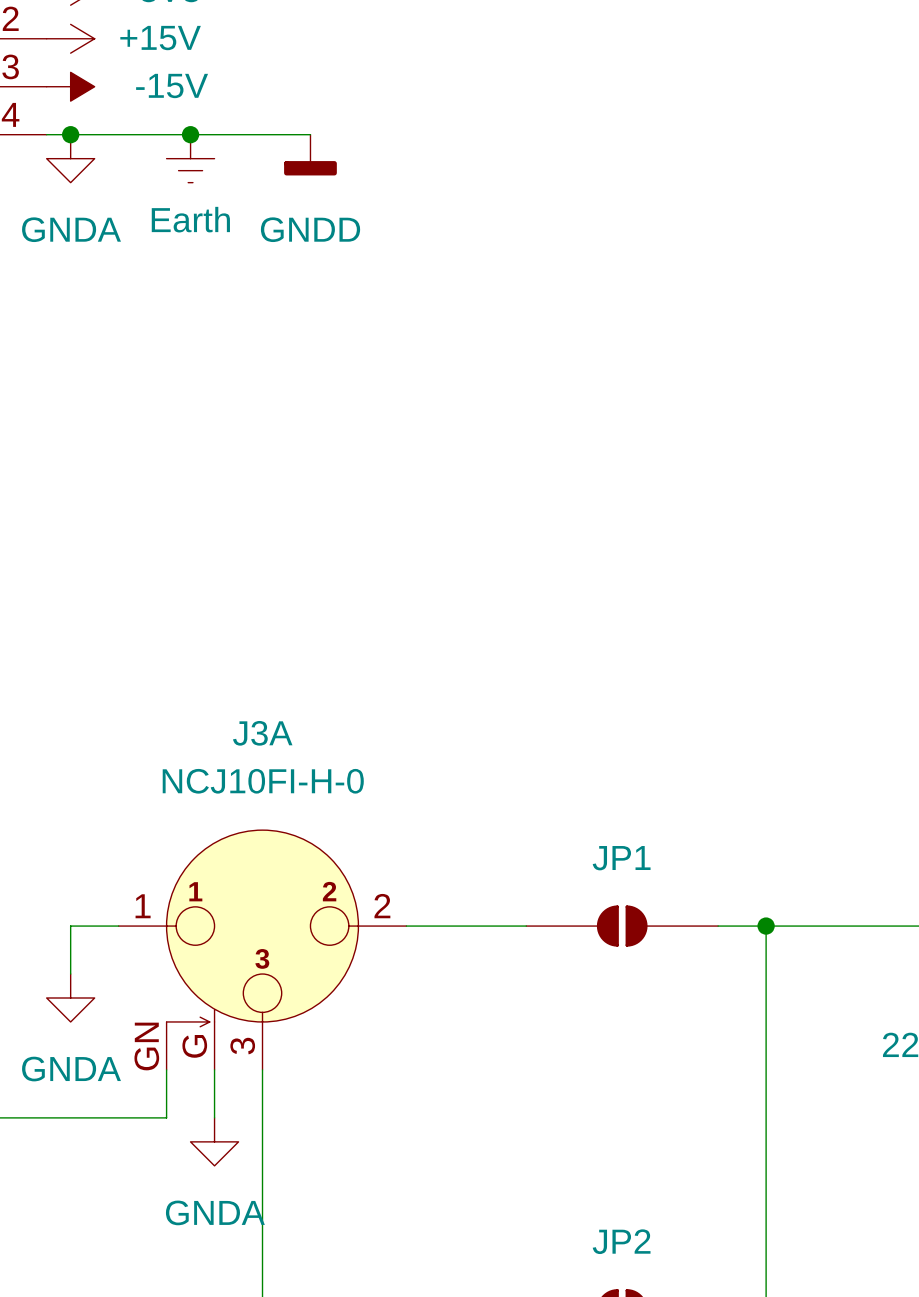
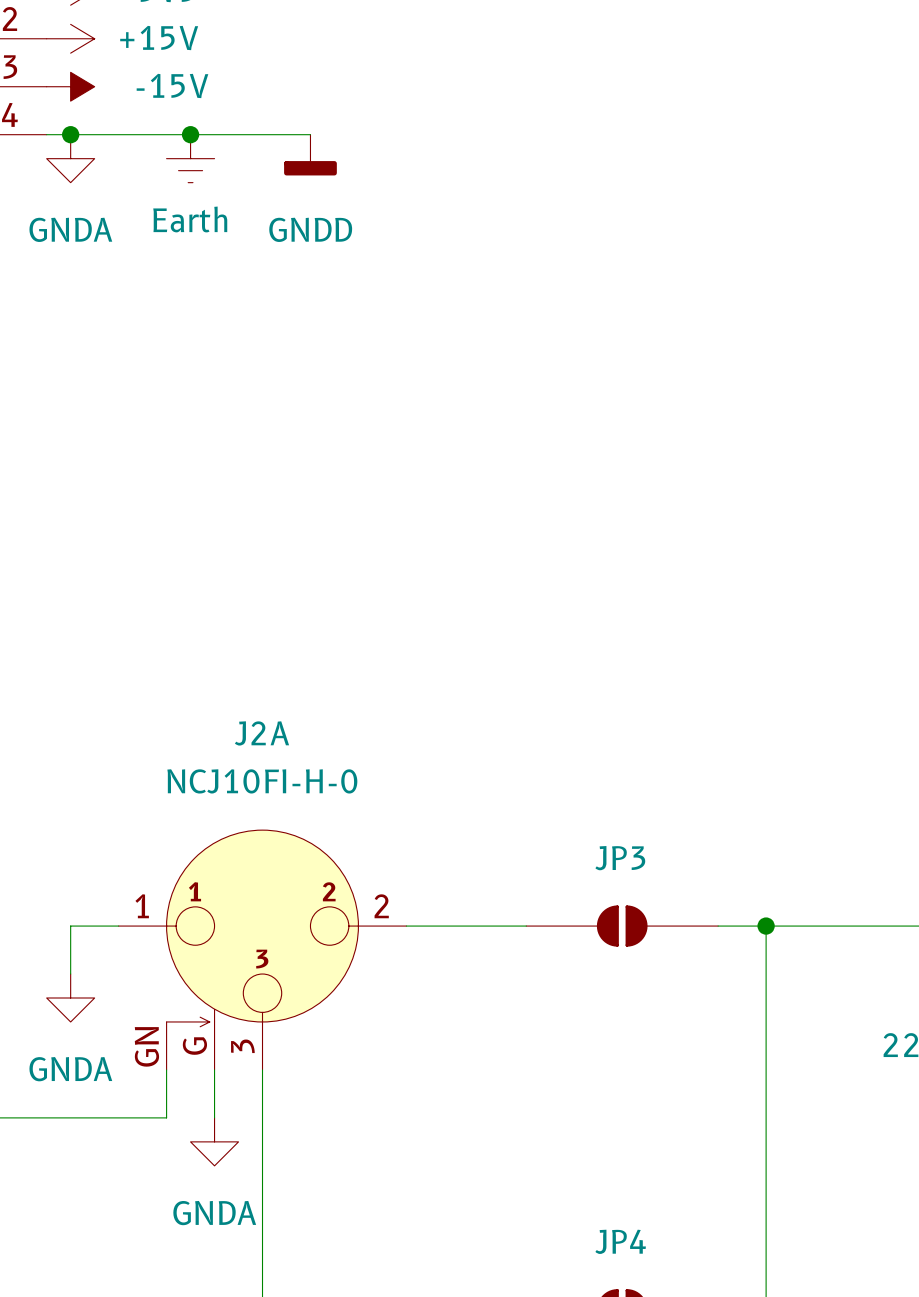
J3A name: J3A (262, 733) -> J2A (261, 733)
JP1 name: JP1 (621, 858) -> JP3 (620, 858)
JP2 name: JP2 (621, 1241) -> JP4 (620, 1241)

